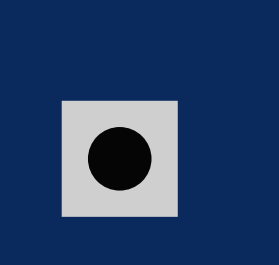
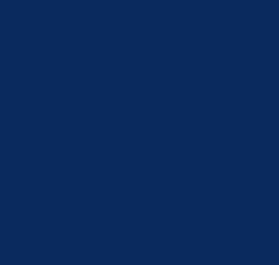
part: (119, 158) -> none

